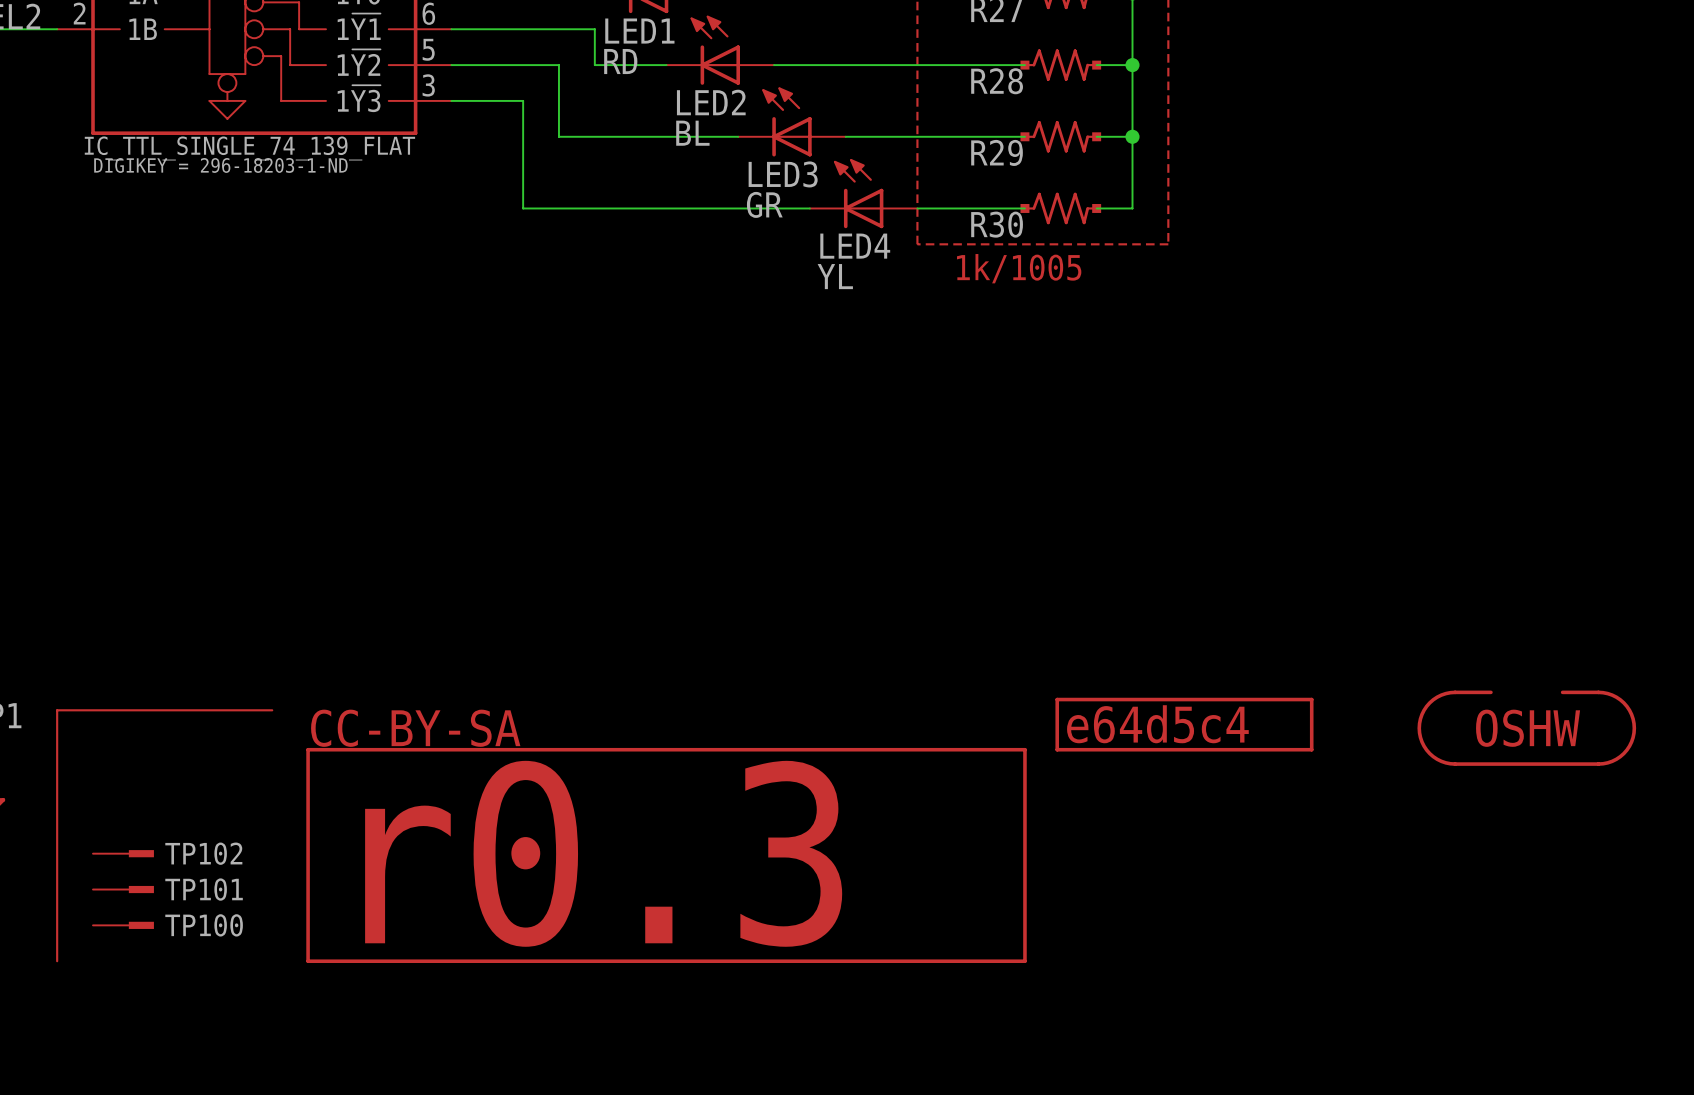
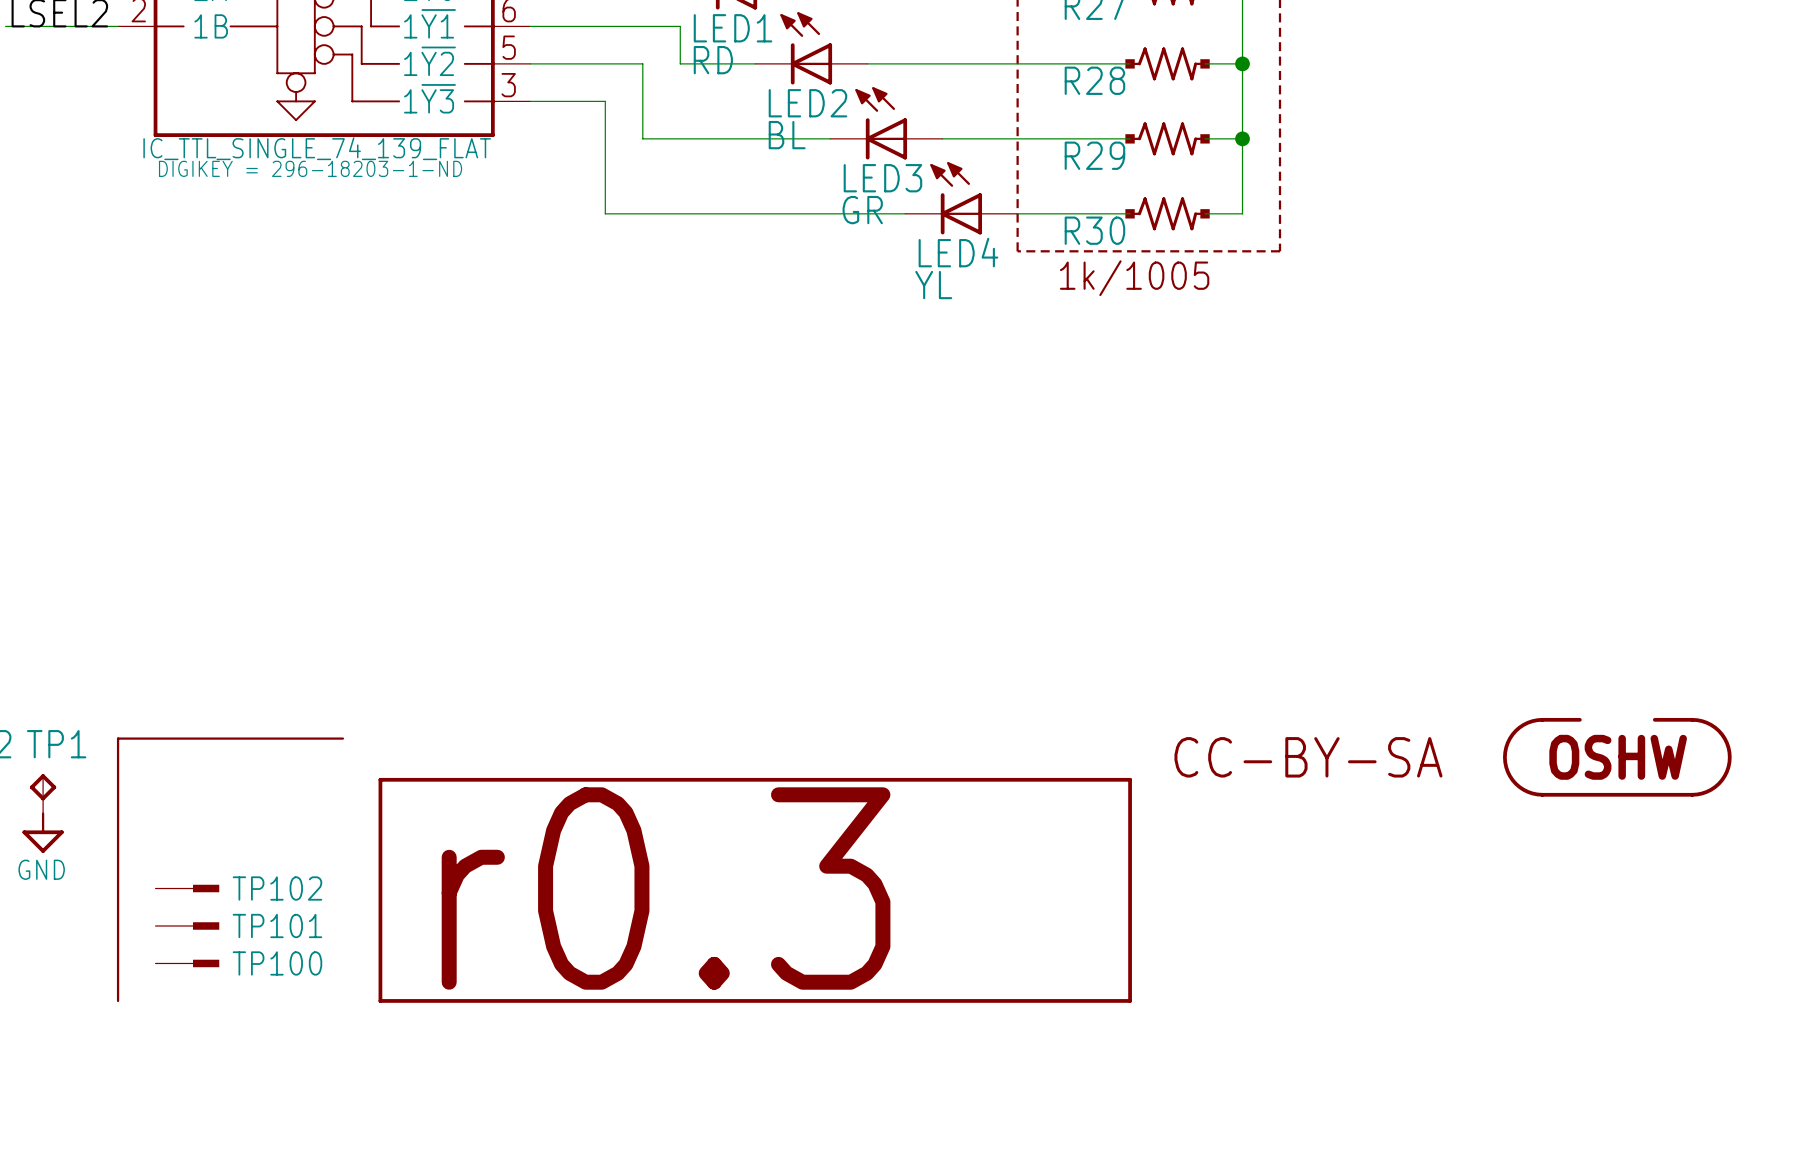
part: e64d5c4 (1184, 724) -> none
text: CC-BY-SA (415, 728) -> none
text: none -> CC-BY-SA (1308, 757)
part position: (1526, 728) -> (1617, 757)

